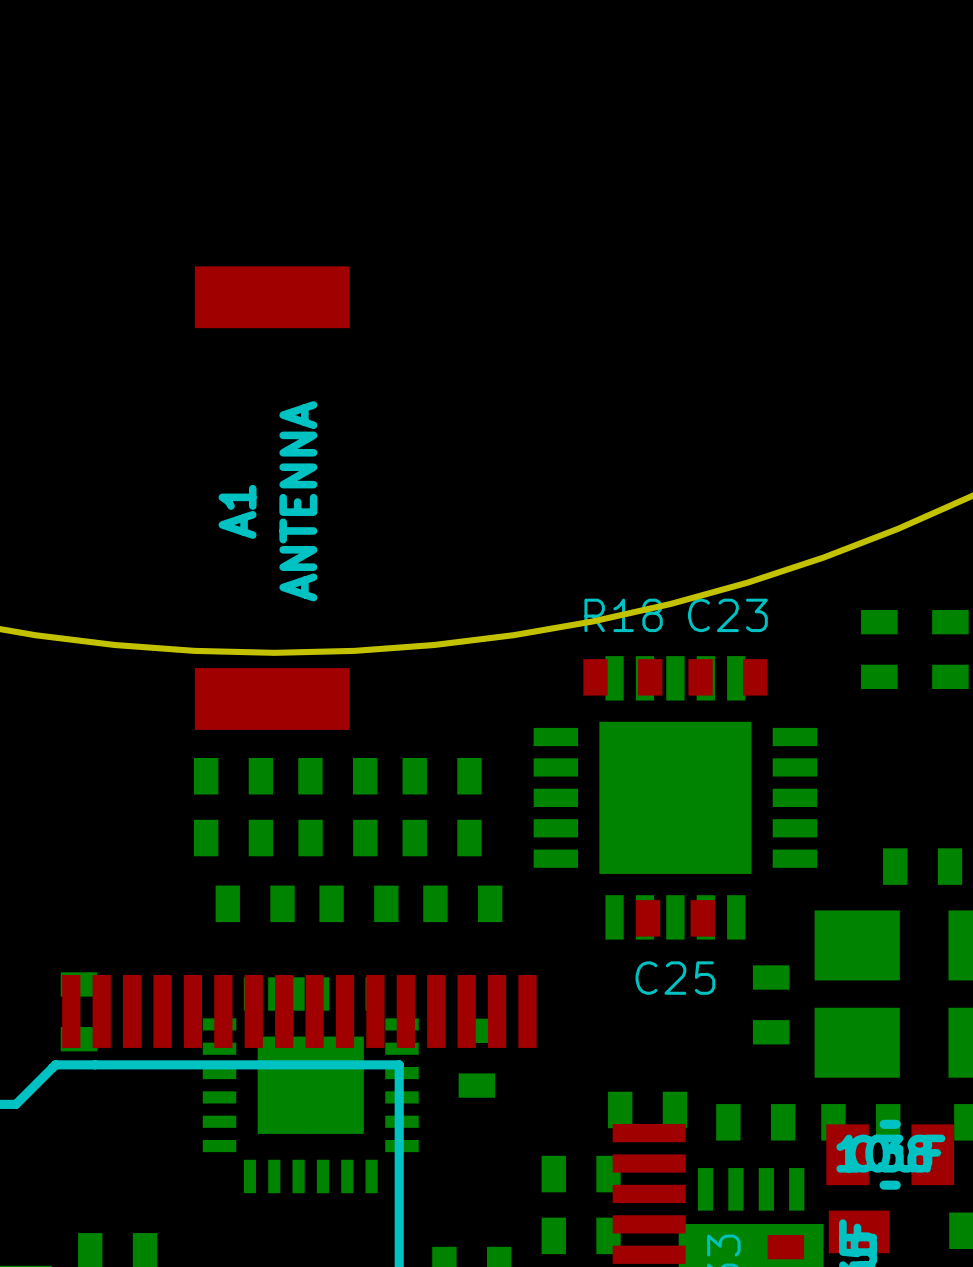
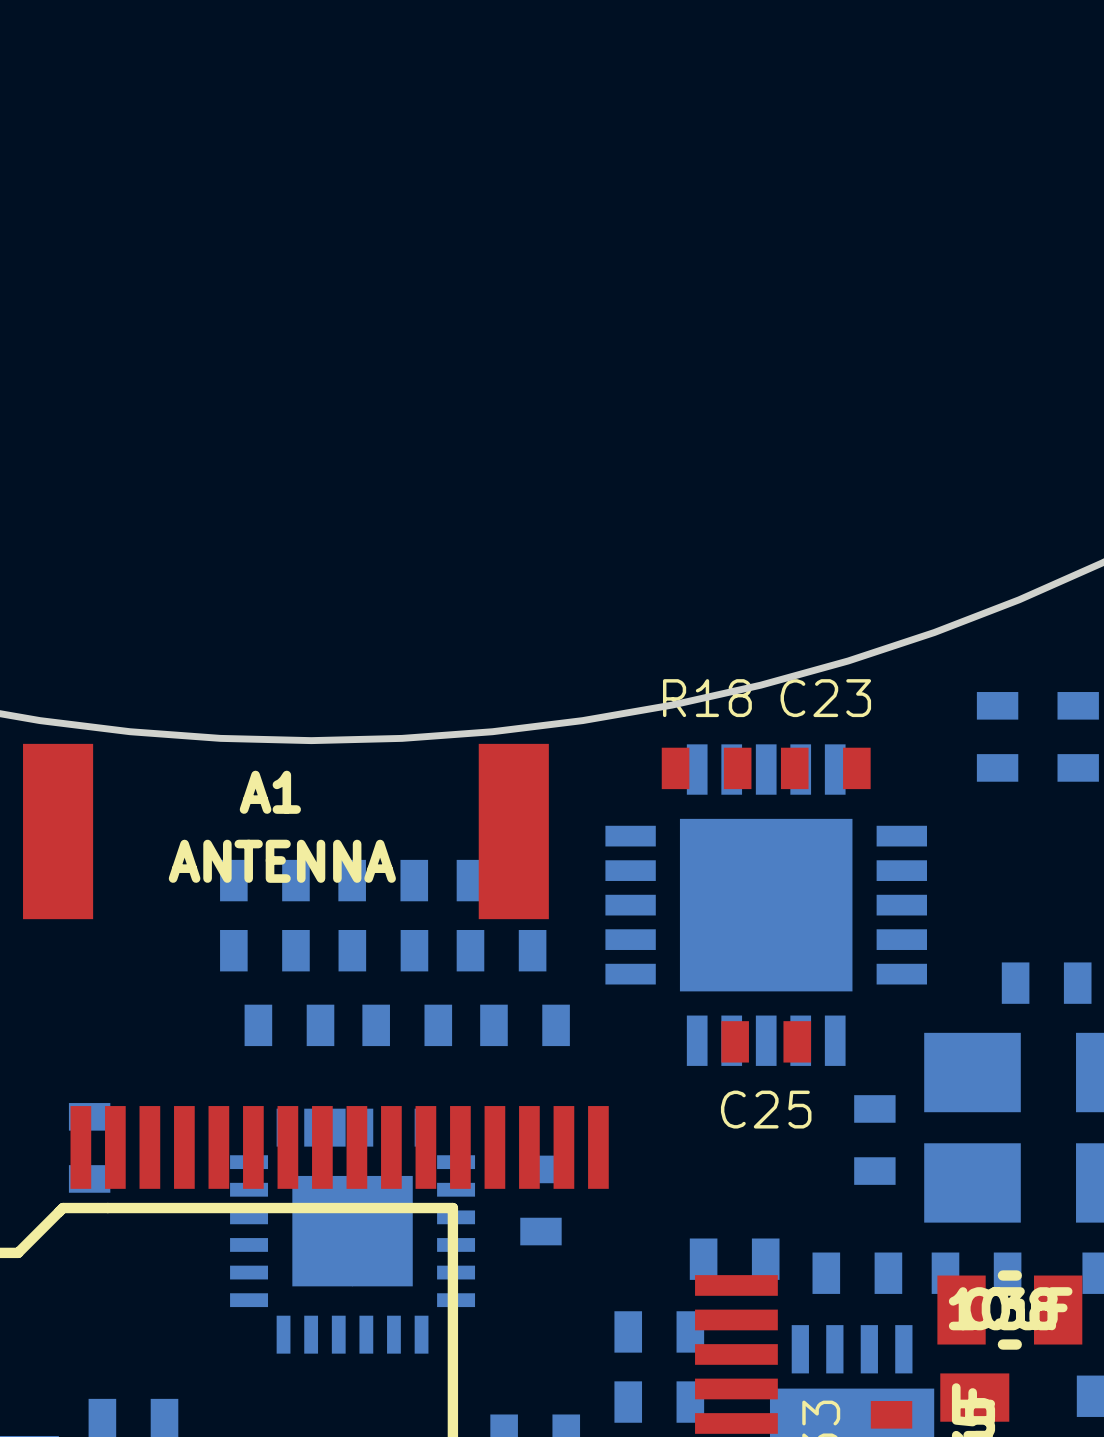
A1 rotation: 0° (272, 498) -> 90° clockwise (285, 831)

